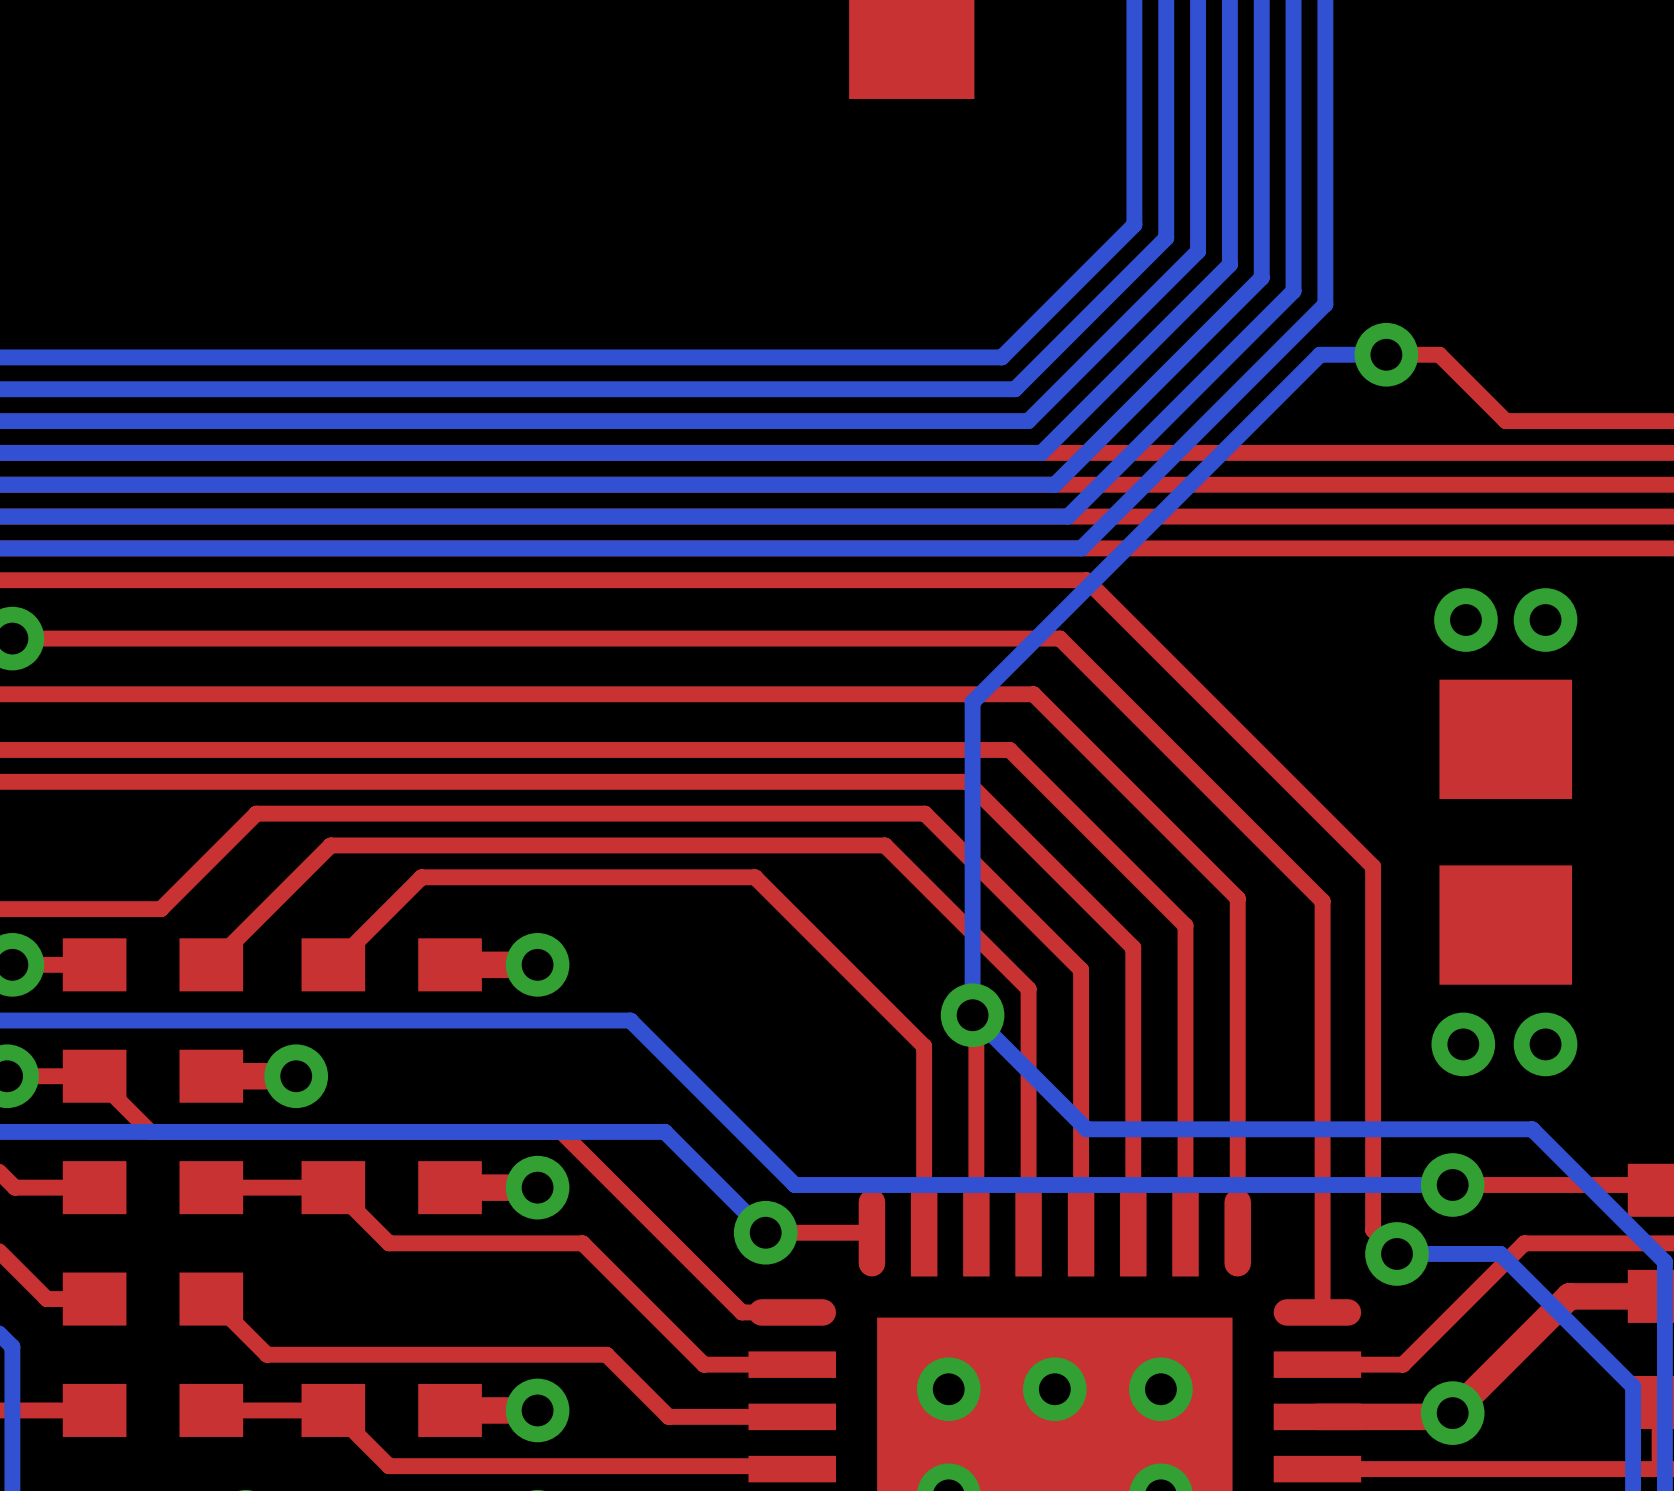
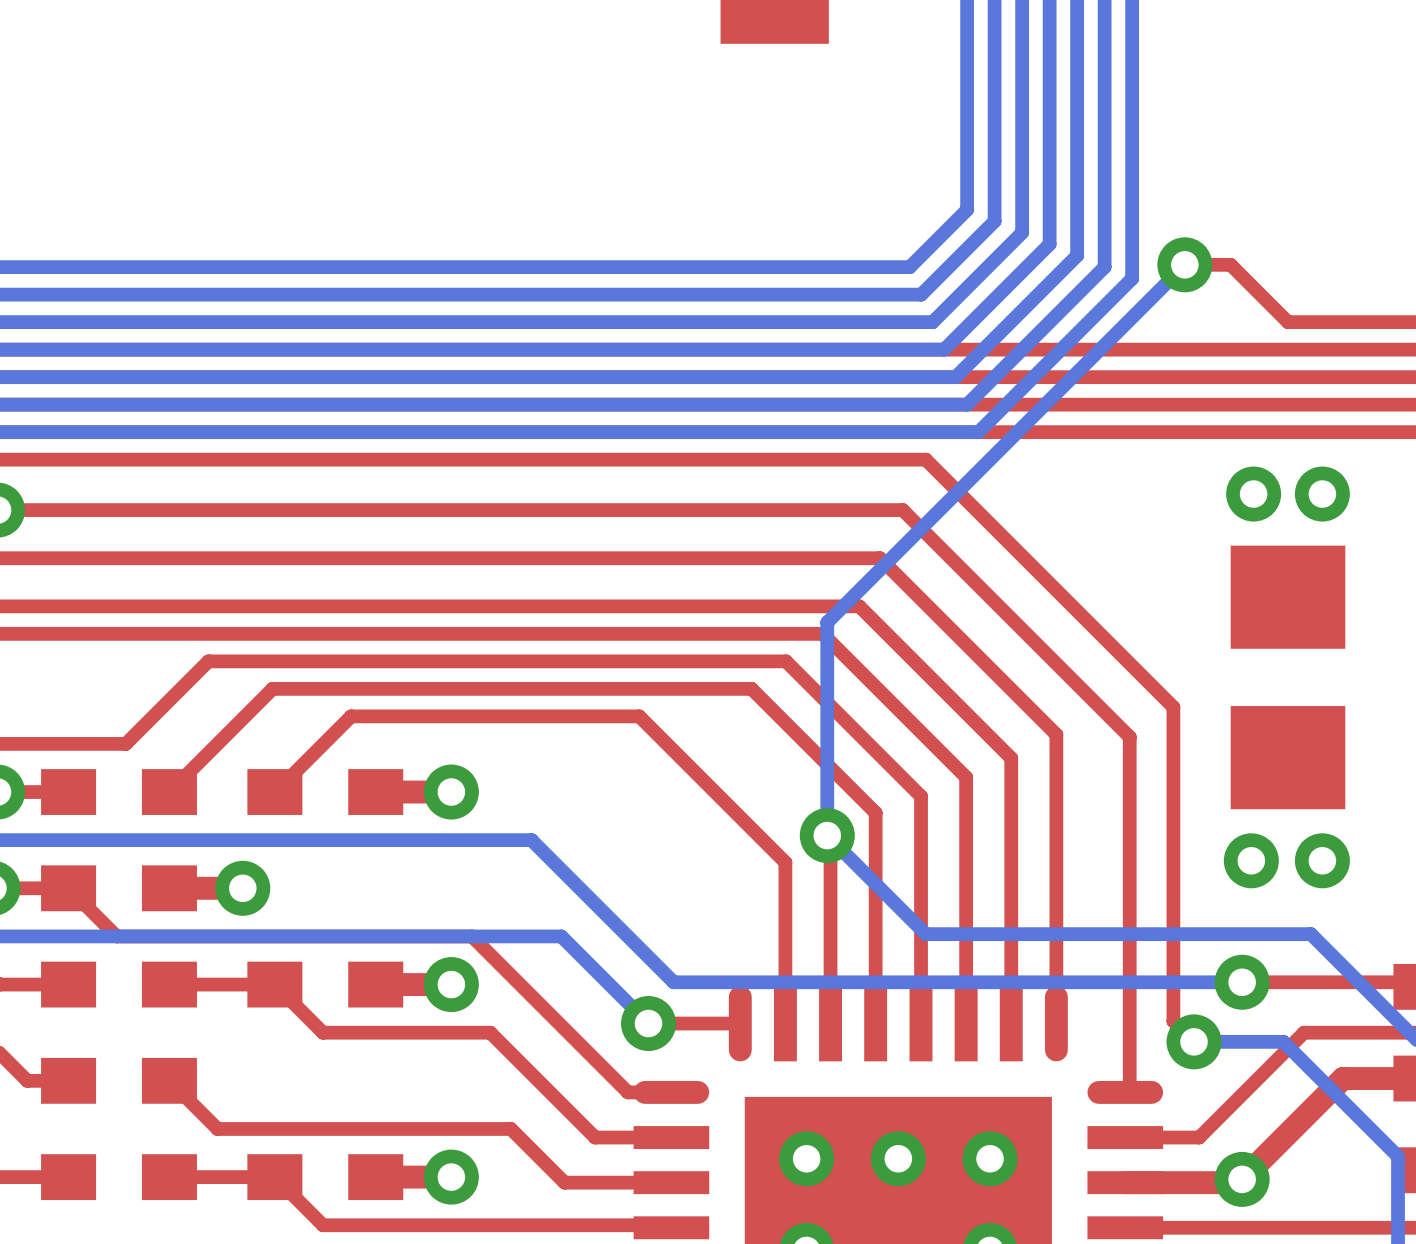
bottom track: (1134, 224) (1001, 357) -> (967, 152) (967, 209) (909, 267) (852, 267)
bottom track: (1166, 238) (1015, 389) -> (994, 163) (994, 221) (921, 294) (863, 294)
bottom track: (1198, 251) (1028, 421) -> (1022, 175) (1022, 232) (932, 322) (875, 322)
bottom track: (1229, 264) (1041, 452) -> (1049, 186) (1049, 244) (944, 349) (886, 349)
bottom track: (1261, 277) (1054, 484) -> (1077, 198) (1077, 255) (955, 377) (898, 377)
bottom track: (1293, 291) (1068, 516) -> (1104, 209) (1104, 267) (967, 404) (909, 404)
bottom track: (1325, 304) (1081, 548) -> (1132, 221) (1132, 278) (978, 432) (921, 432)
bottom track: (1386, 354) (1320, 354) (972, 702) (972, 768) -> (1184, 264) (827, 622)

